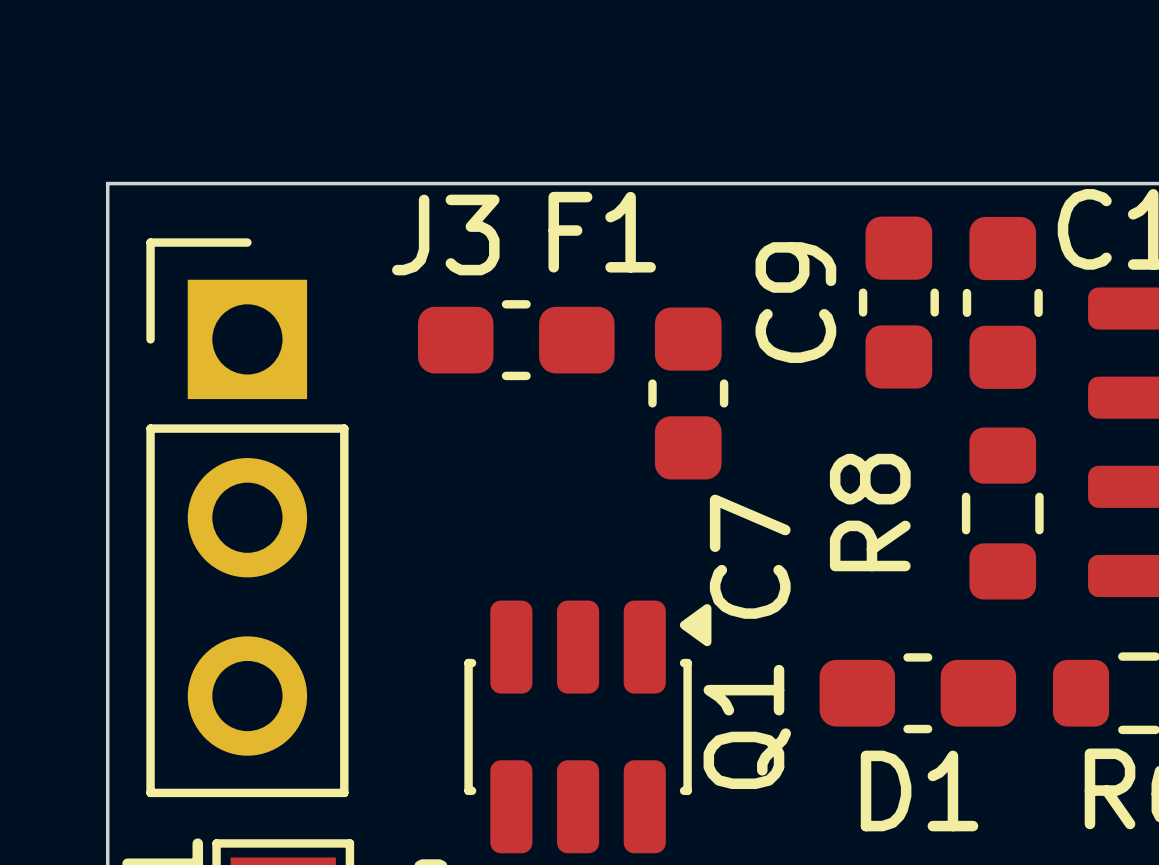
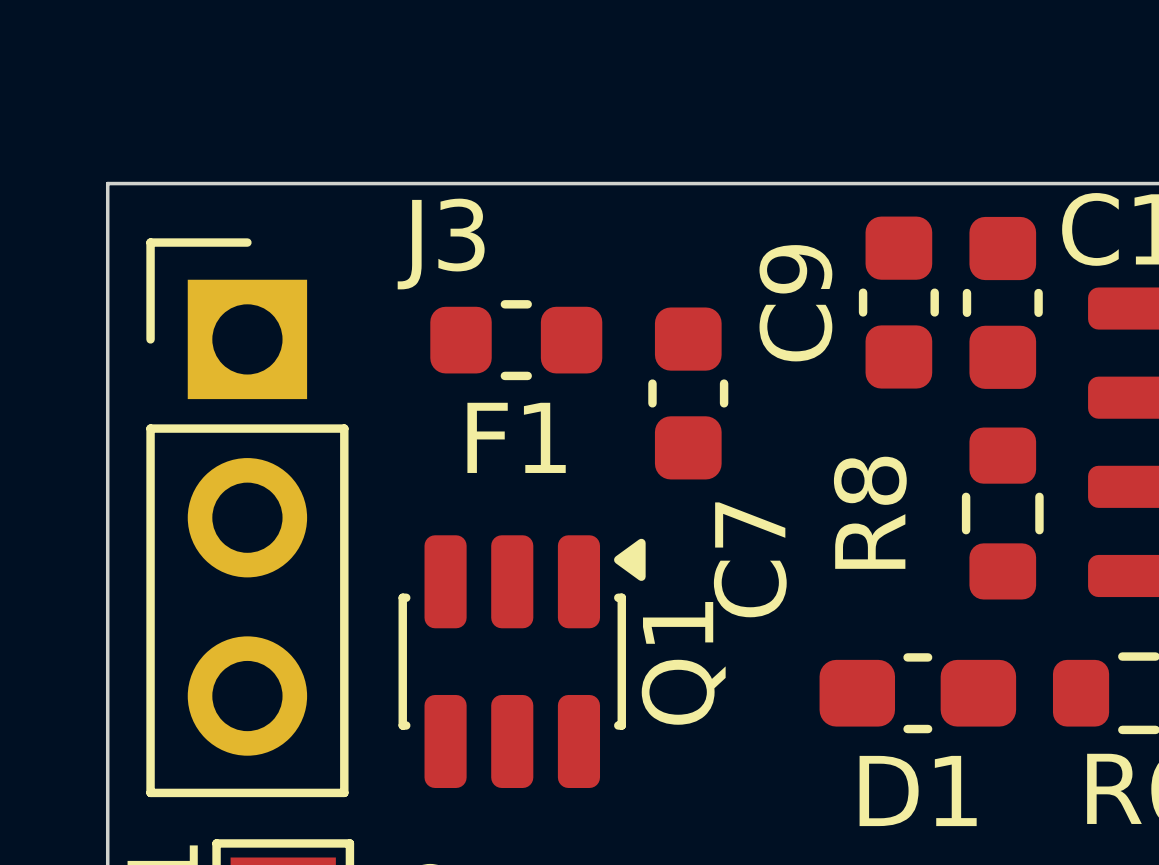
F1 name position: F1 (602, 232) -> F1 (516, 437)
F1 footprint: [418, 300, 615, 381] -> [430, 300, 603, 381]
Q1 position: (587, 726) -> (522, 661)

